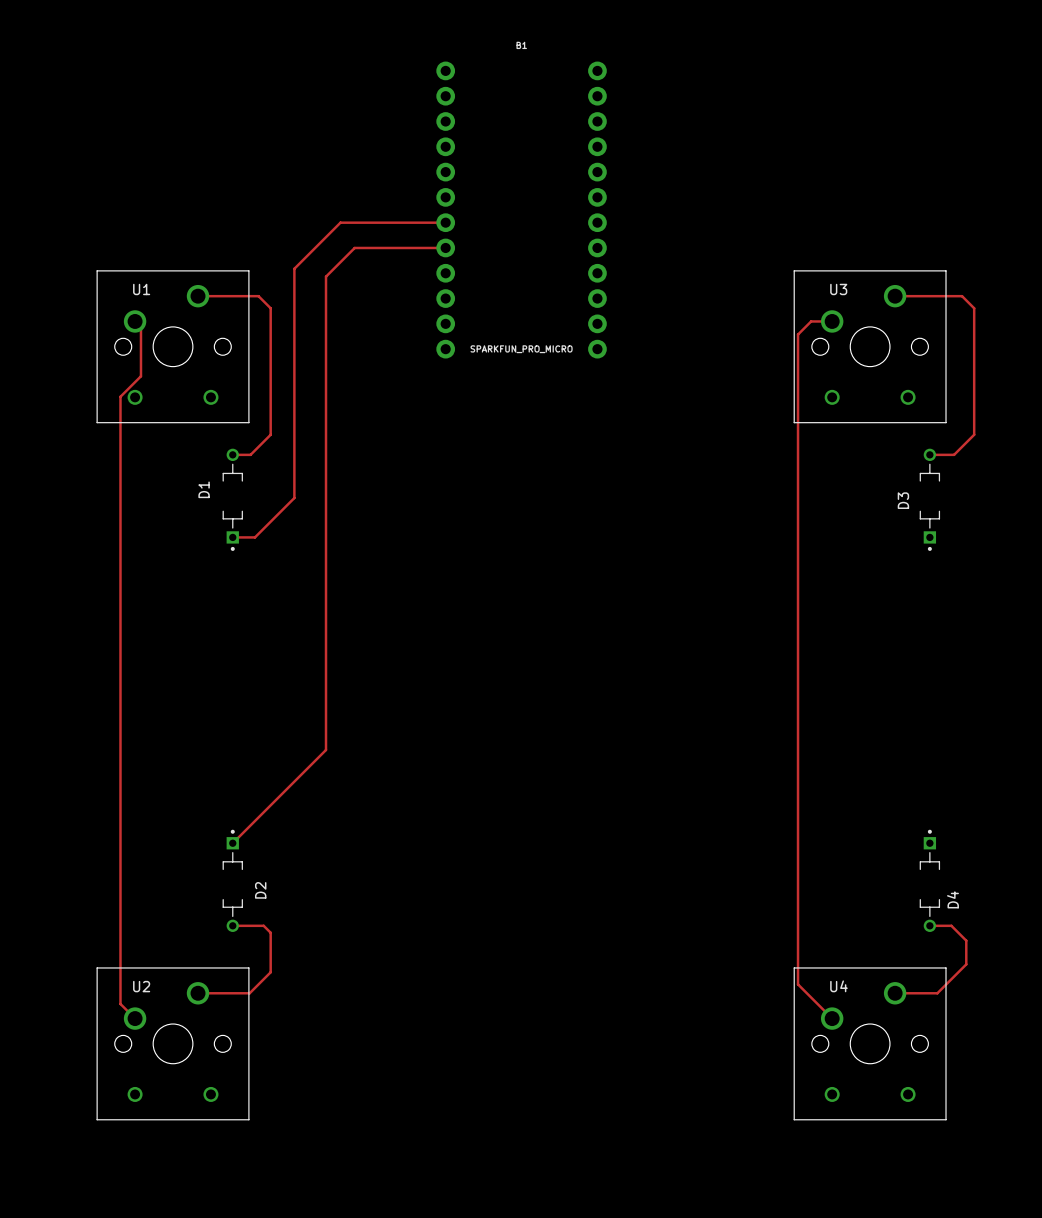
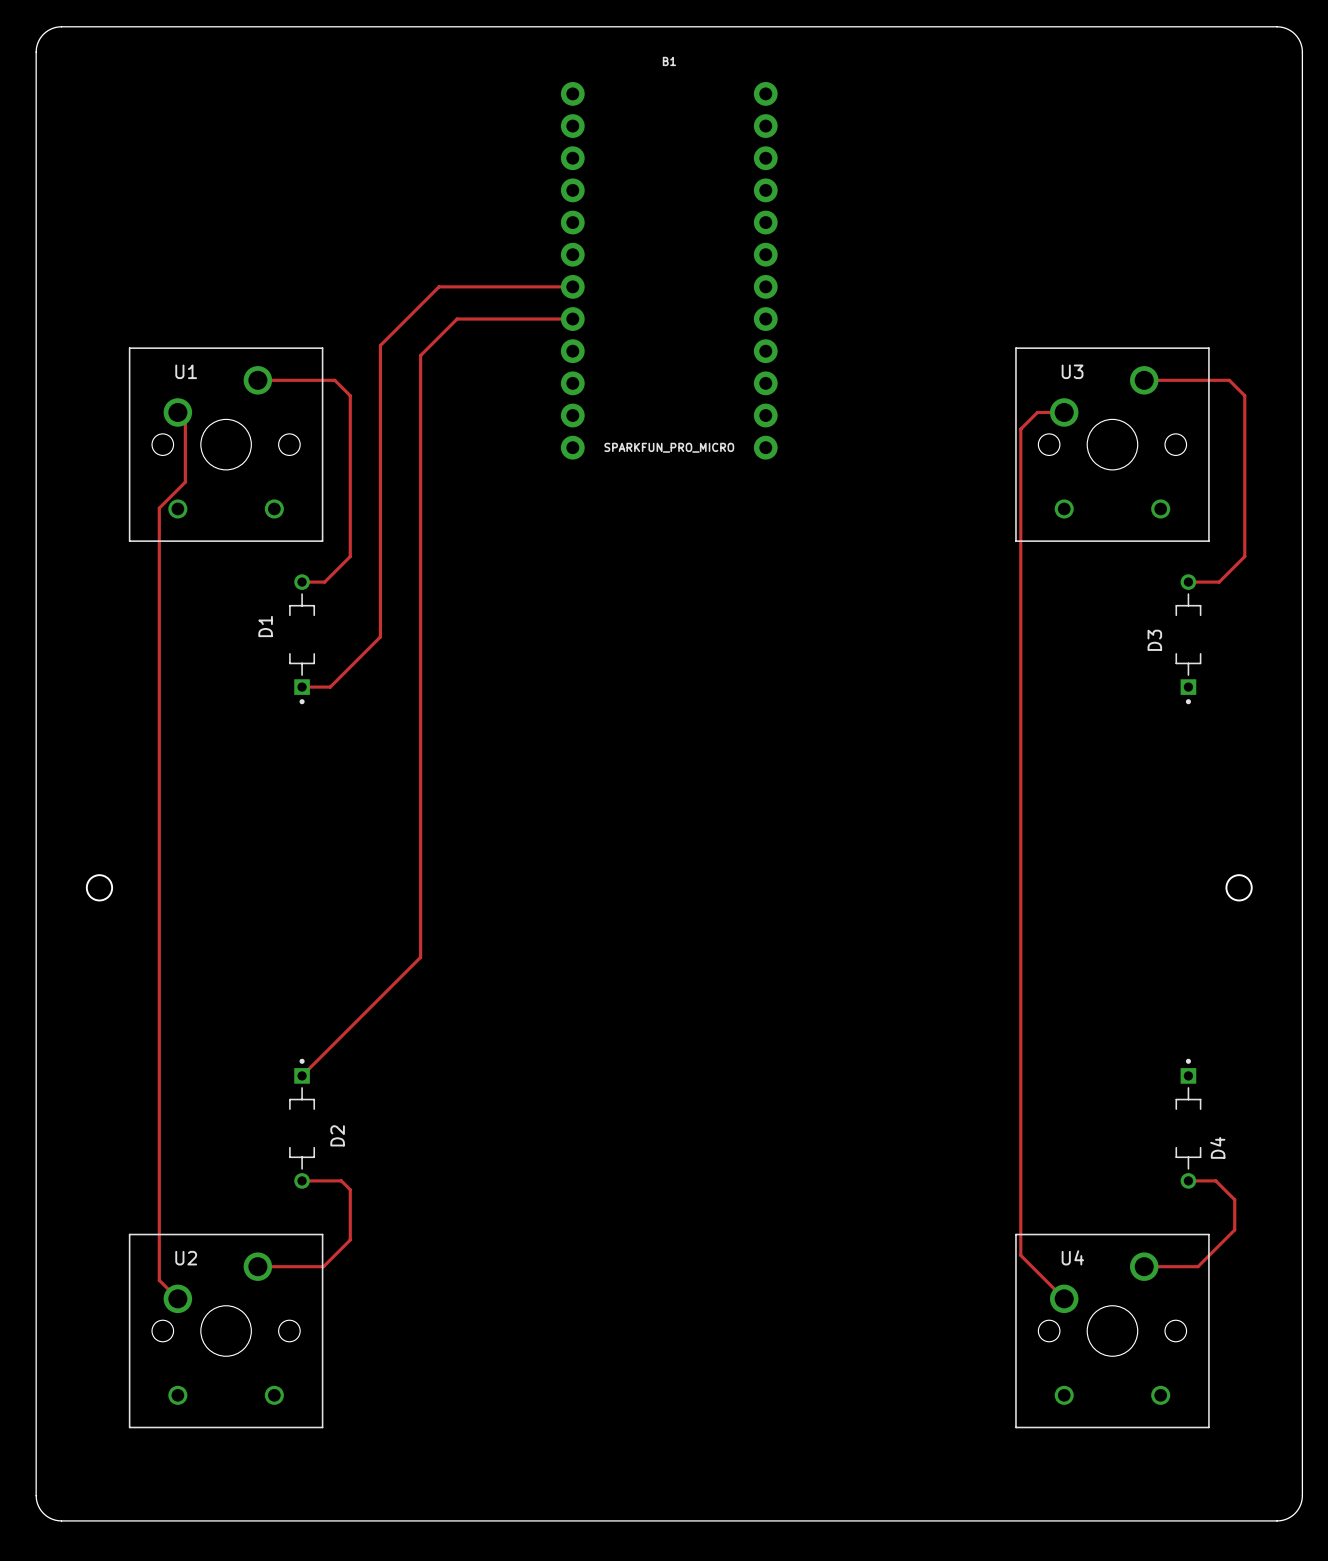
board edge: none -> (61, 26) (1277, 26) (1288, 29) (1296, 36) (1302, 52) (1302, 1495) (1299, 1506) (1292, 1515) (1277, 1520) (61, 1520) (50, 1518) (41, 1511) (36, 1495) (36, 52) (37, 43) (43, 34) (50, 29) (61, 26)
round board edge: none -> [85, 874, 114, 902]
round board edge: none -> [1225, 874, 1253, 902]

